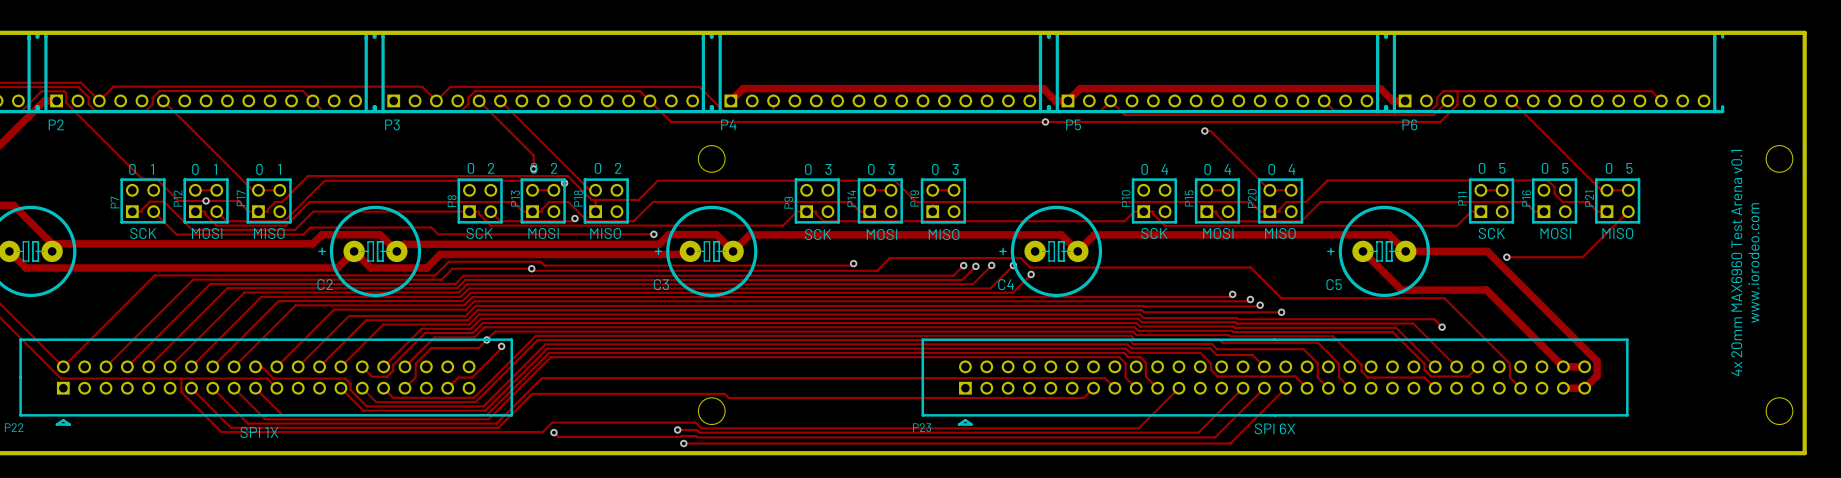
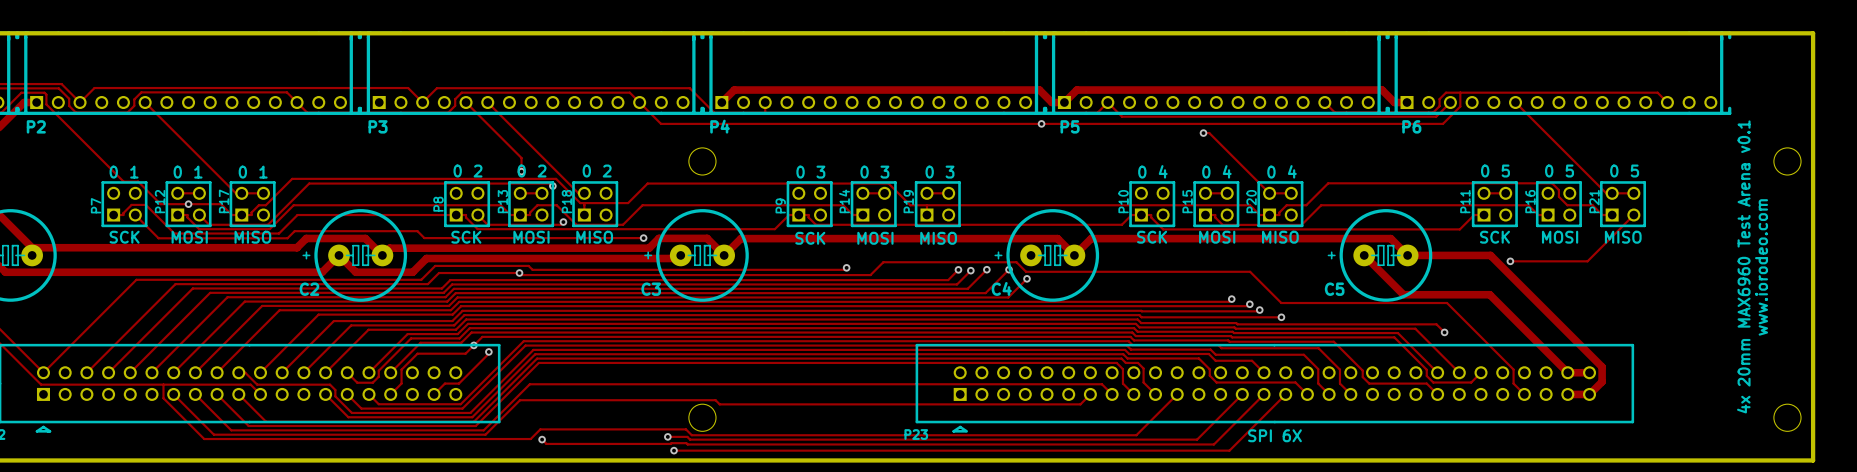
text: SPI 1X (259, 432) -> none

